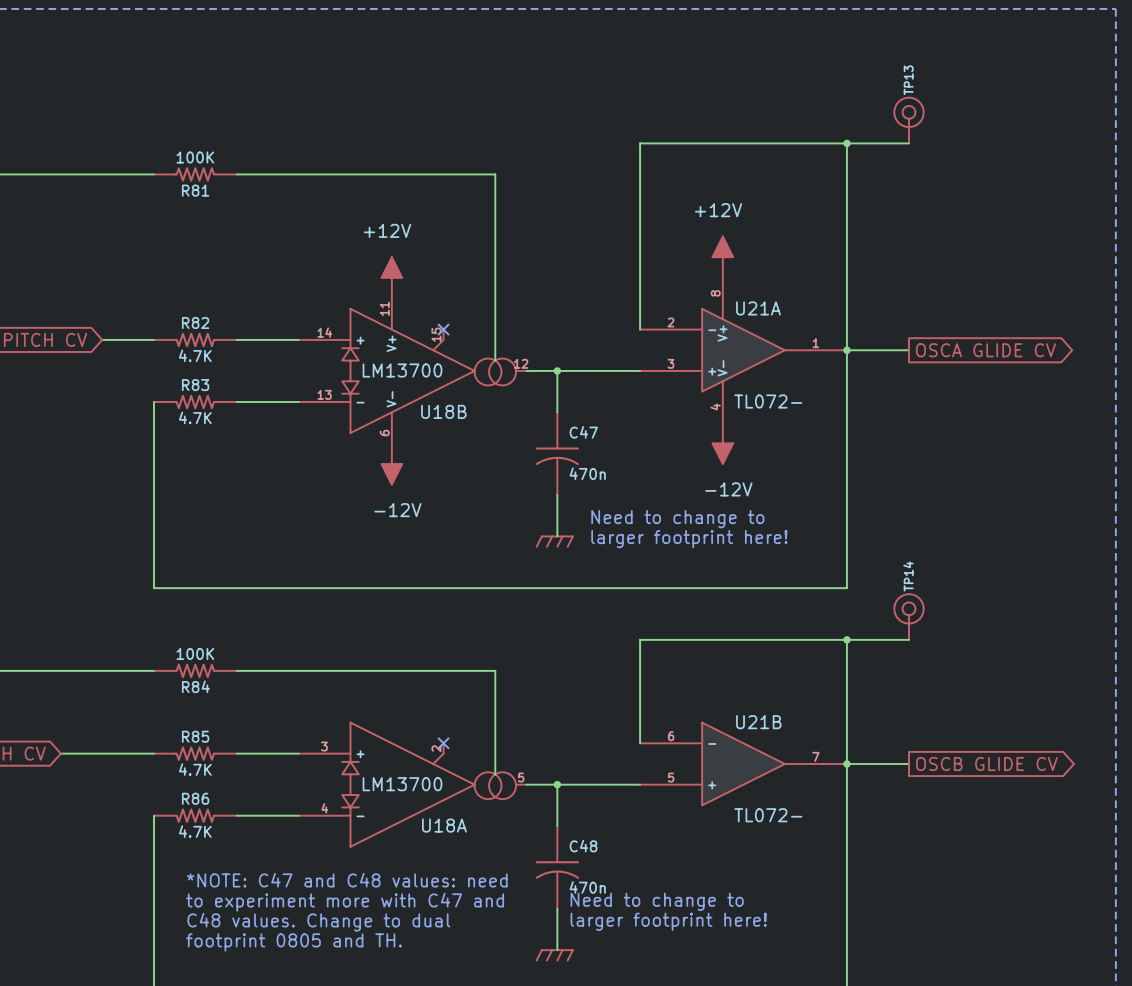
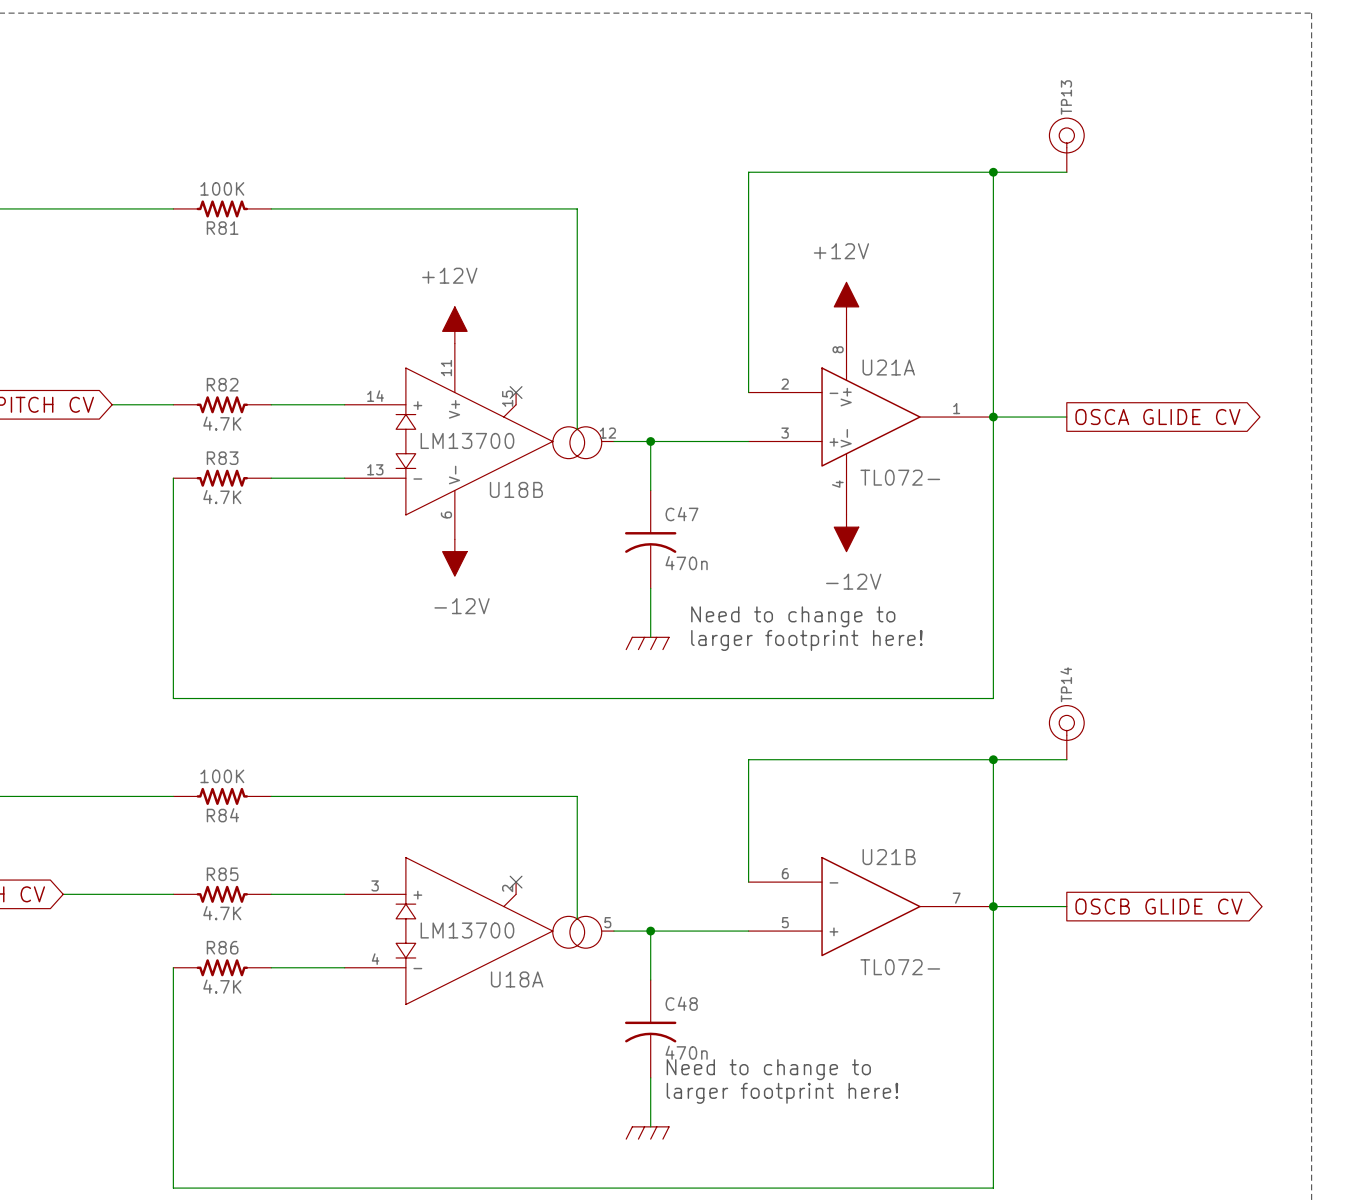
text: *NOTE: C47 and C48 values: need (347, 880) -> none
text: to experiment more with C47 and (345, 902) -> none
text: C48 values. Change to dual (318, 922) -> none
text: footprint 0805 and TH. (293, 942) -> none

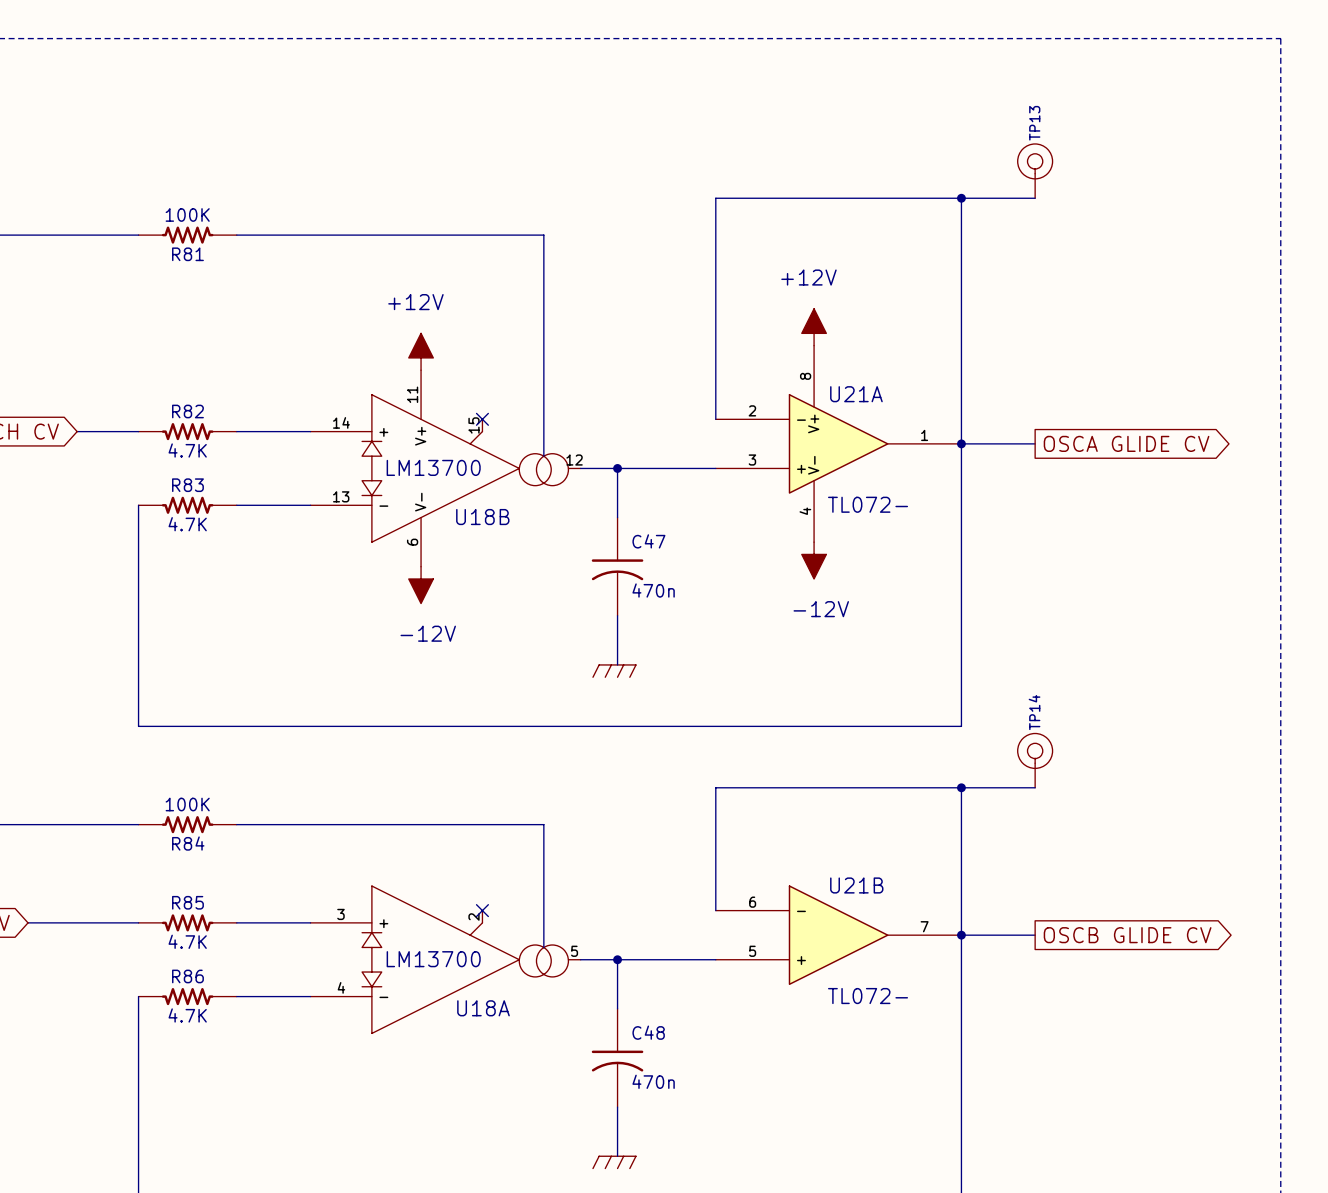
text: Need to change to (793, 616) -> none
text: larger footprint here! (806, 640) -> none
text: Need to change to (768, 1069) -> none
text: larger footprint here! (782, 1093) -> none

